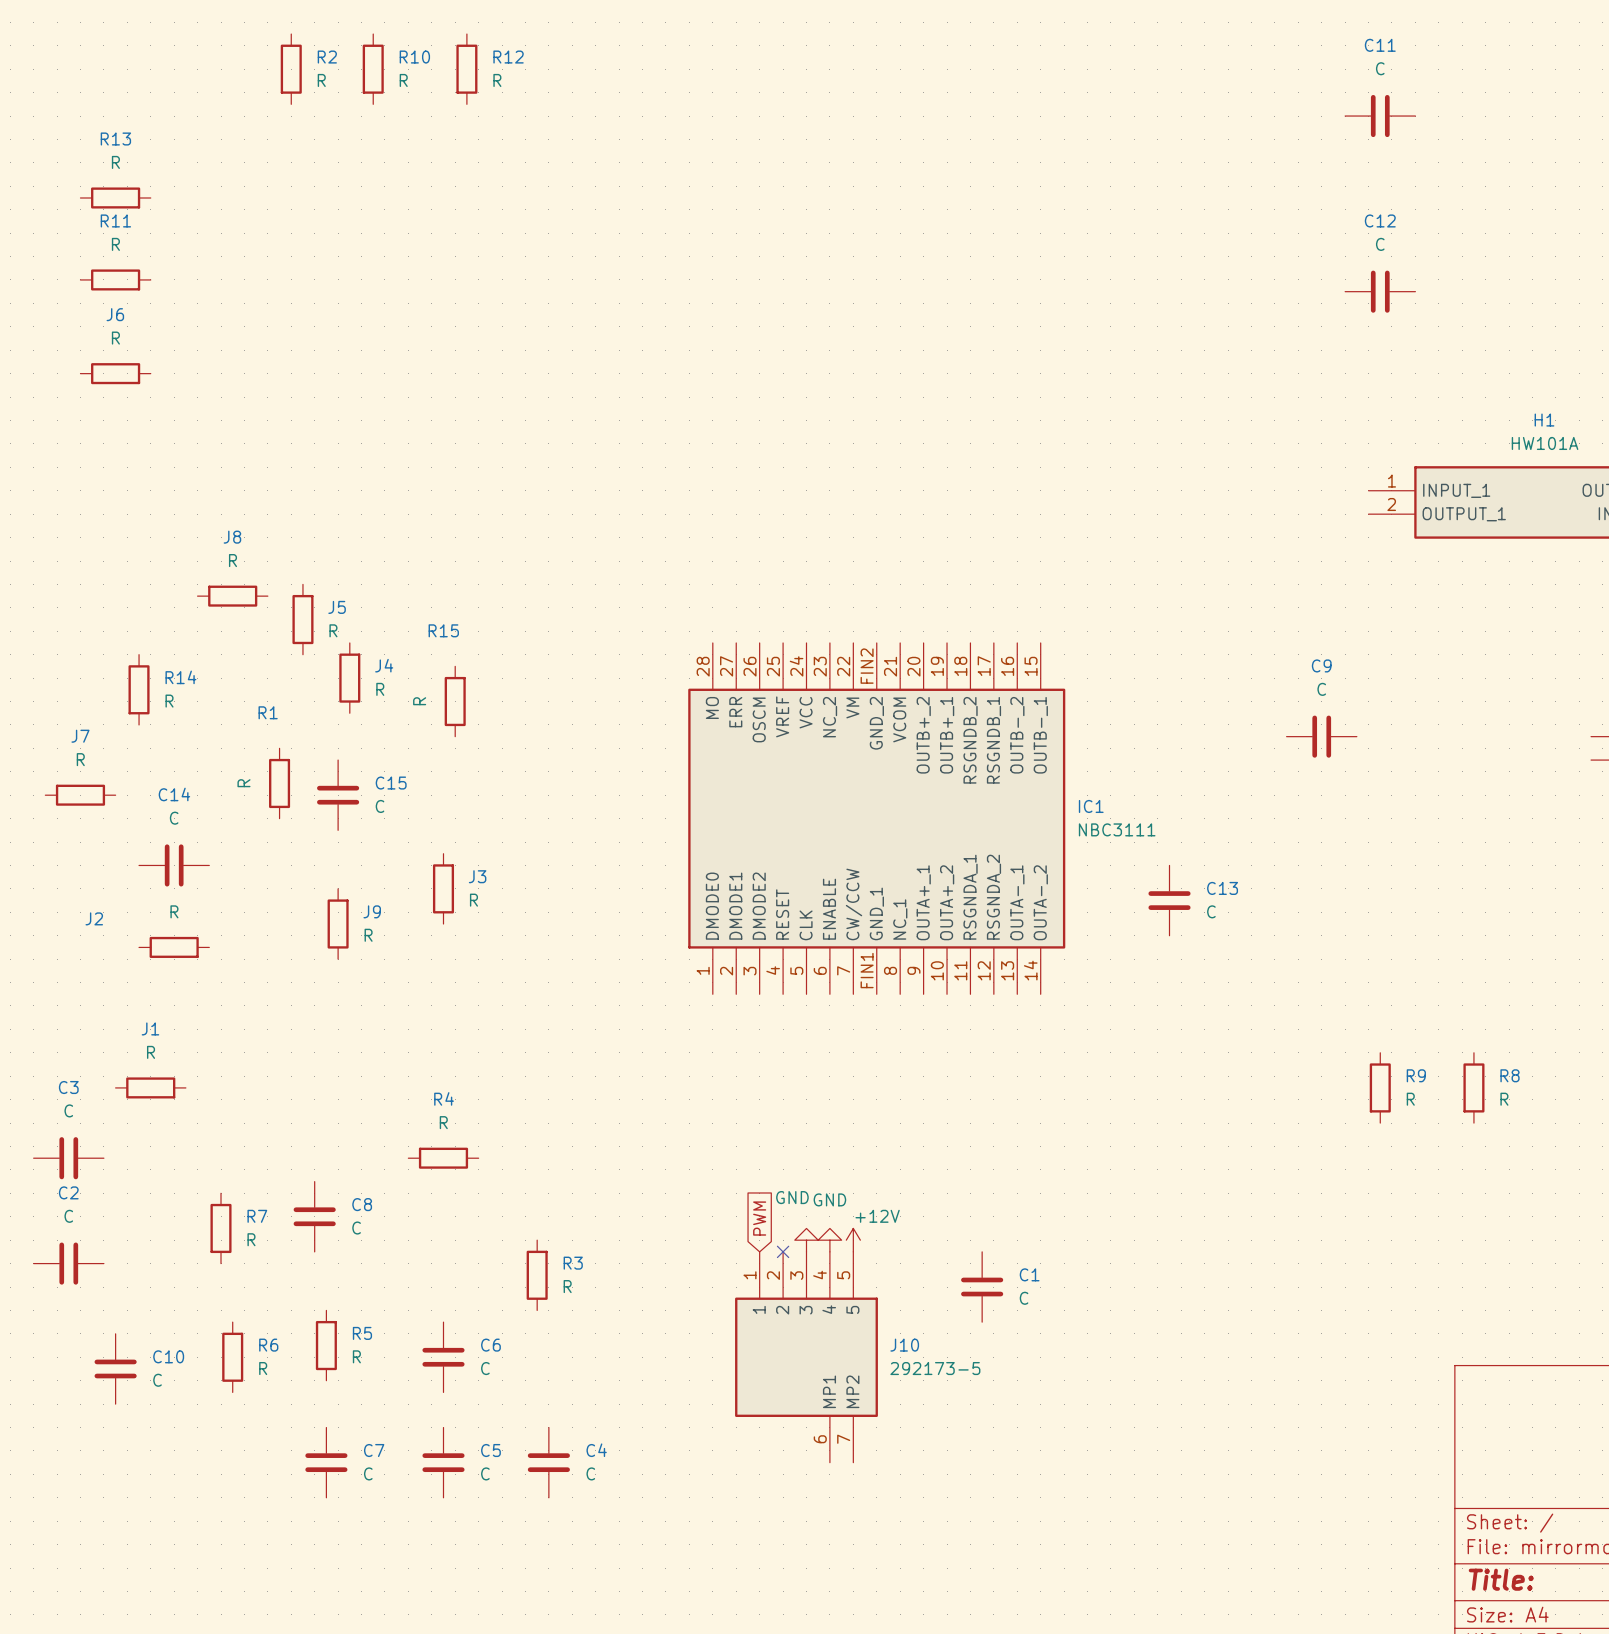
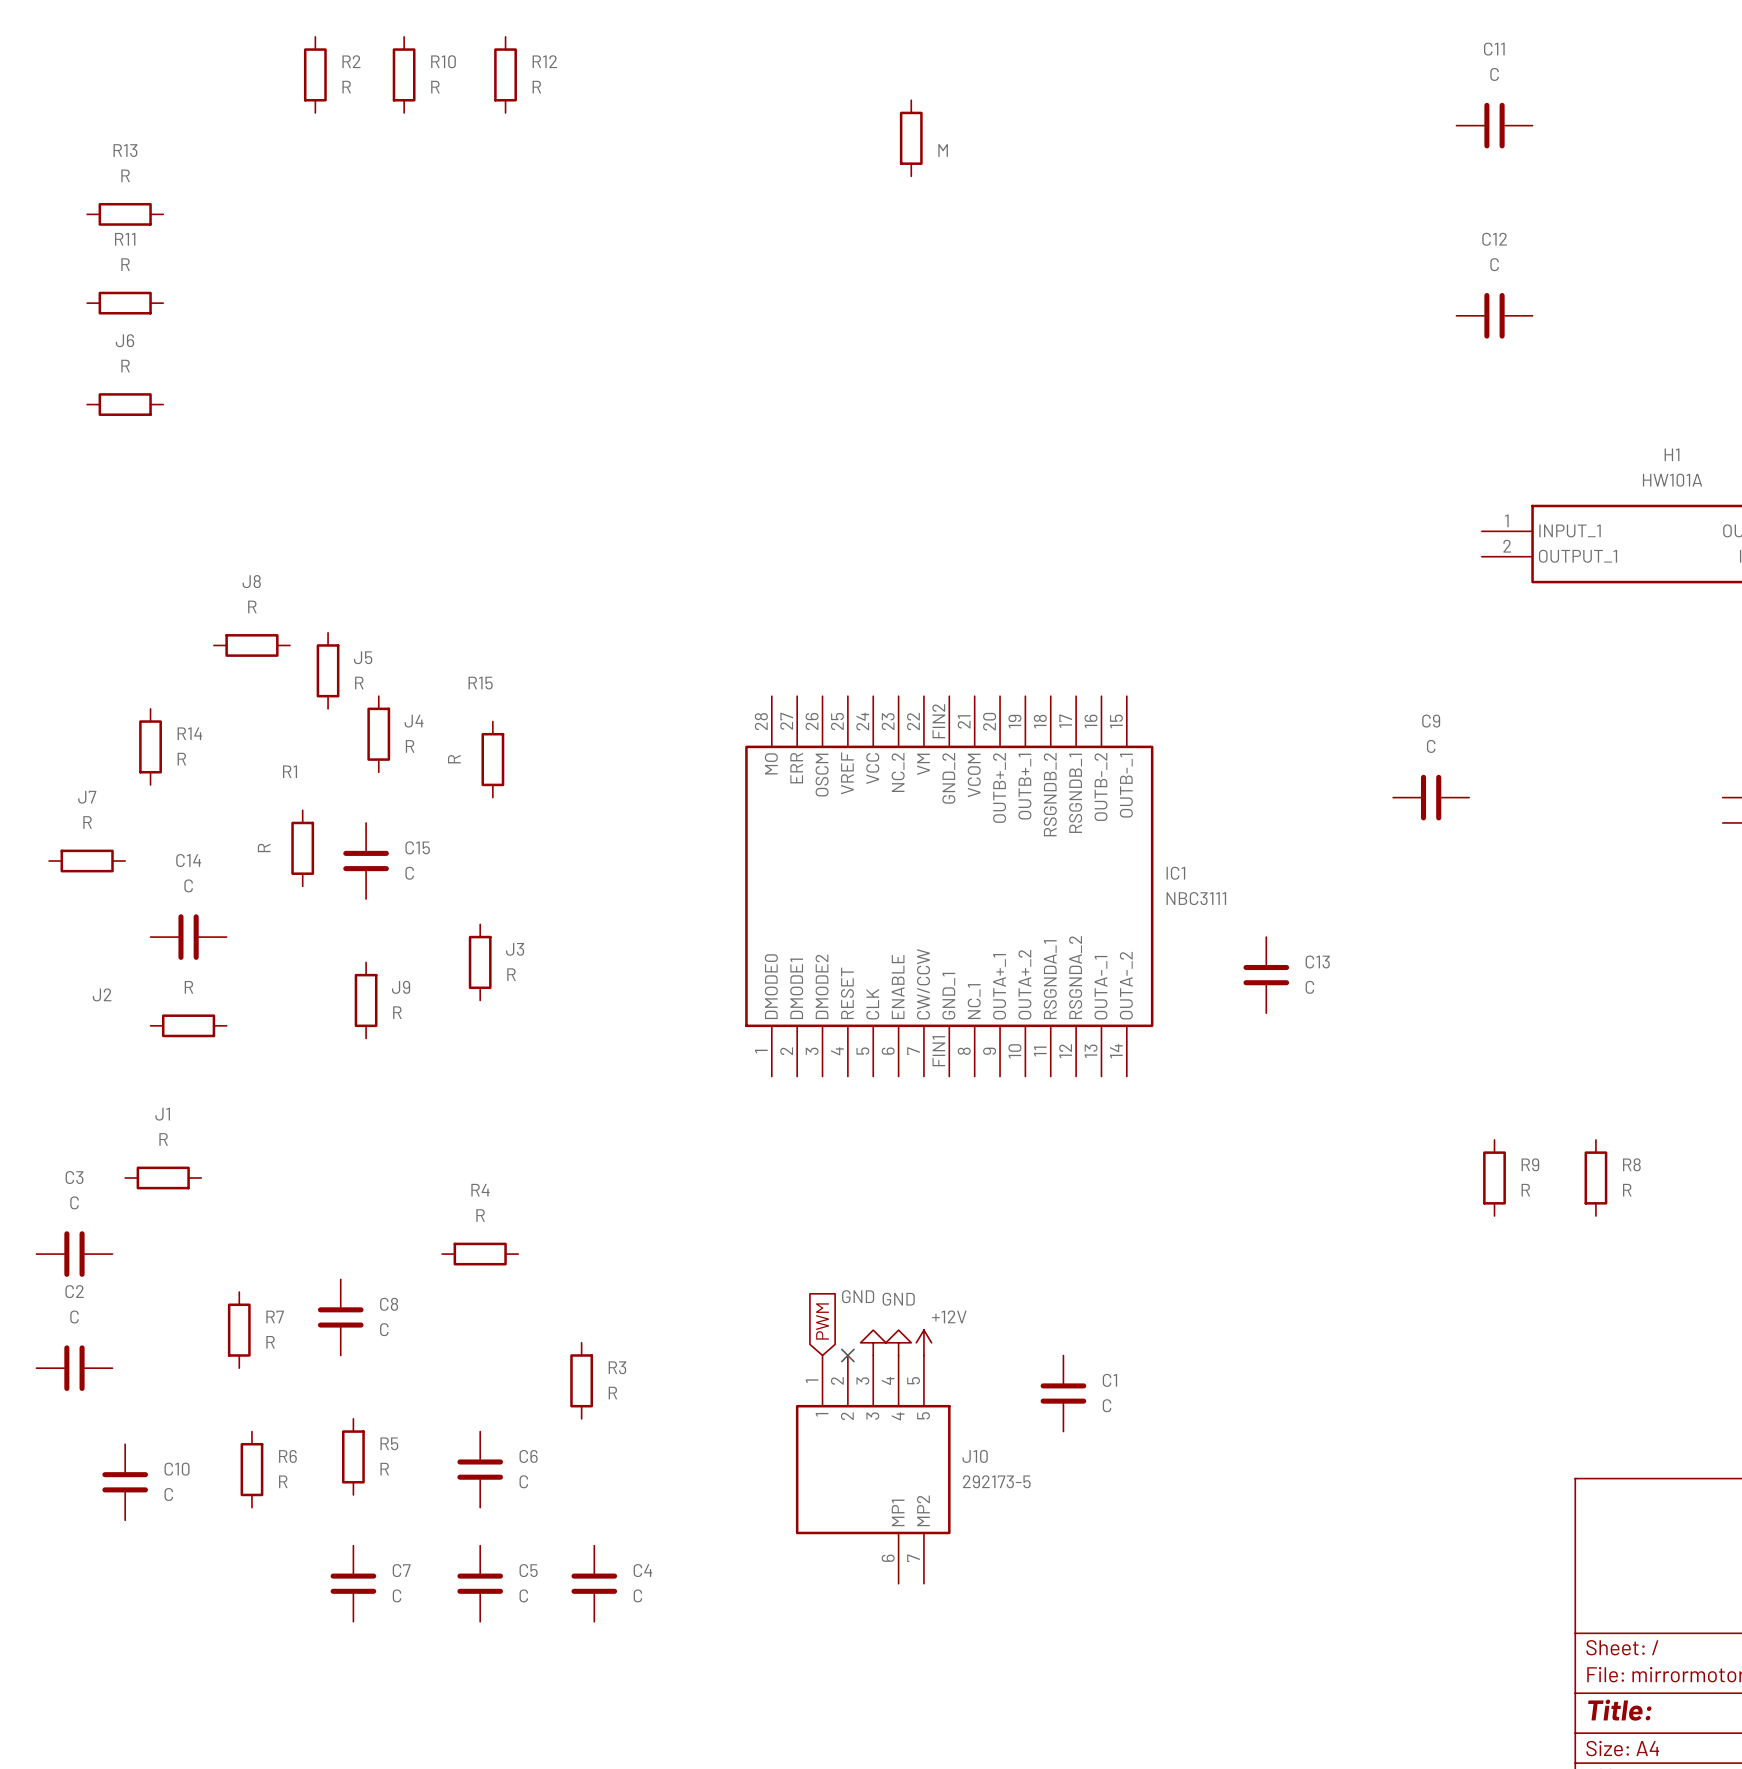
part: none -> M (911, 138)

